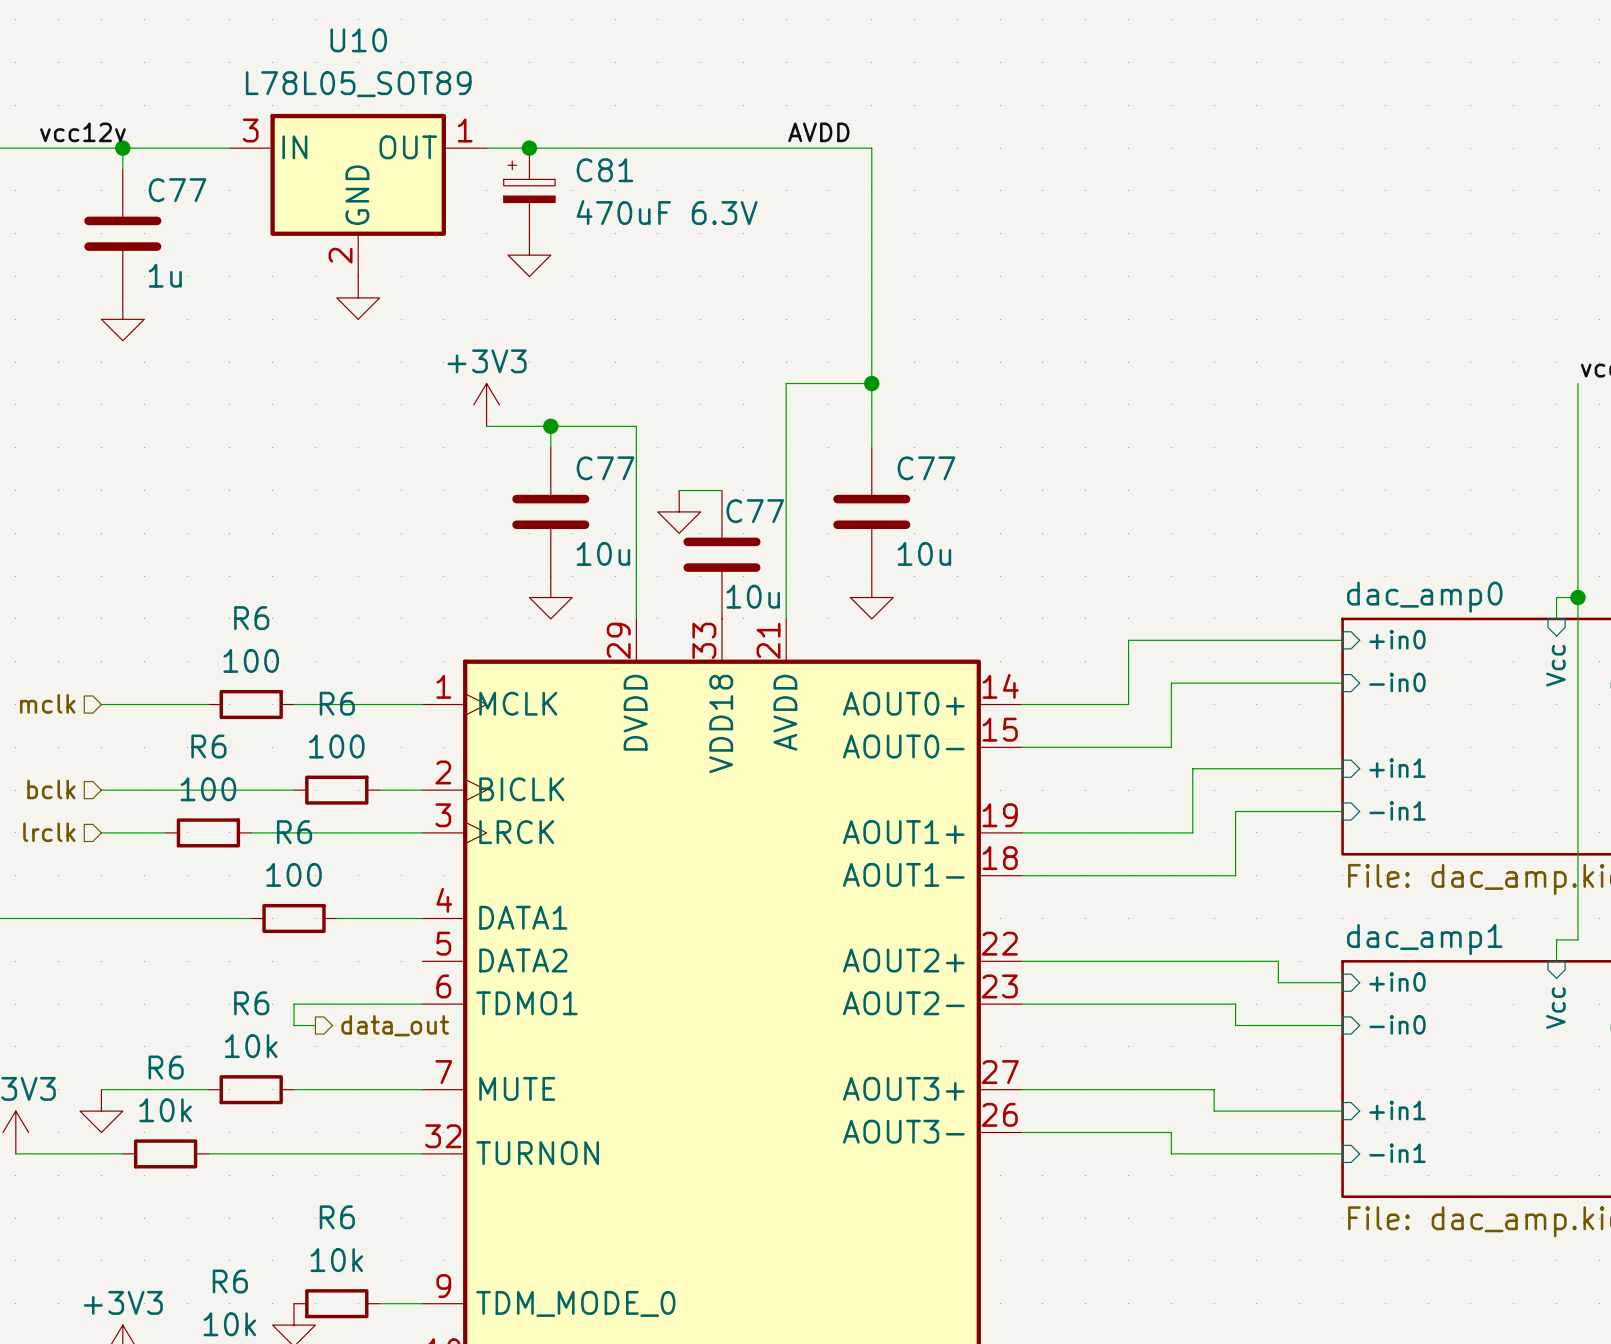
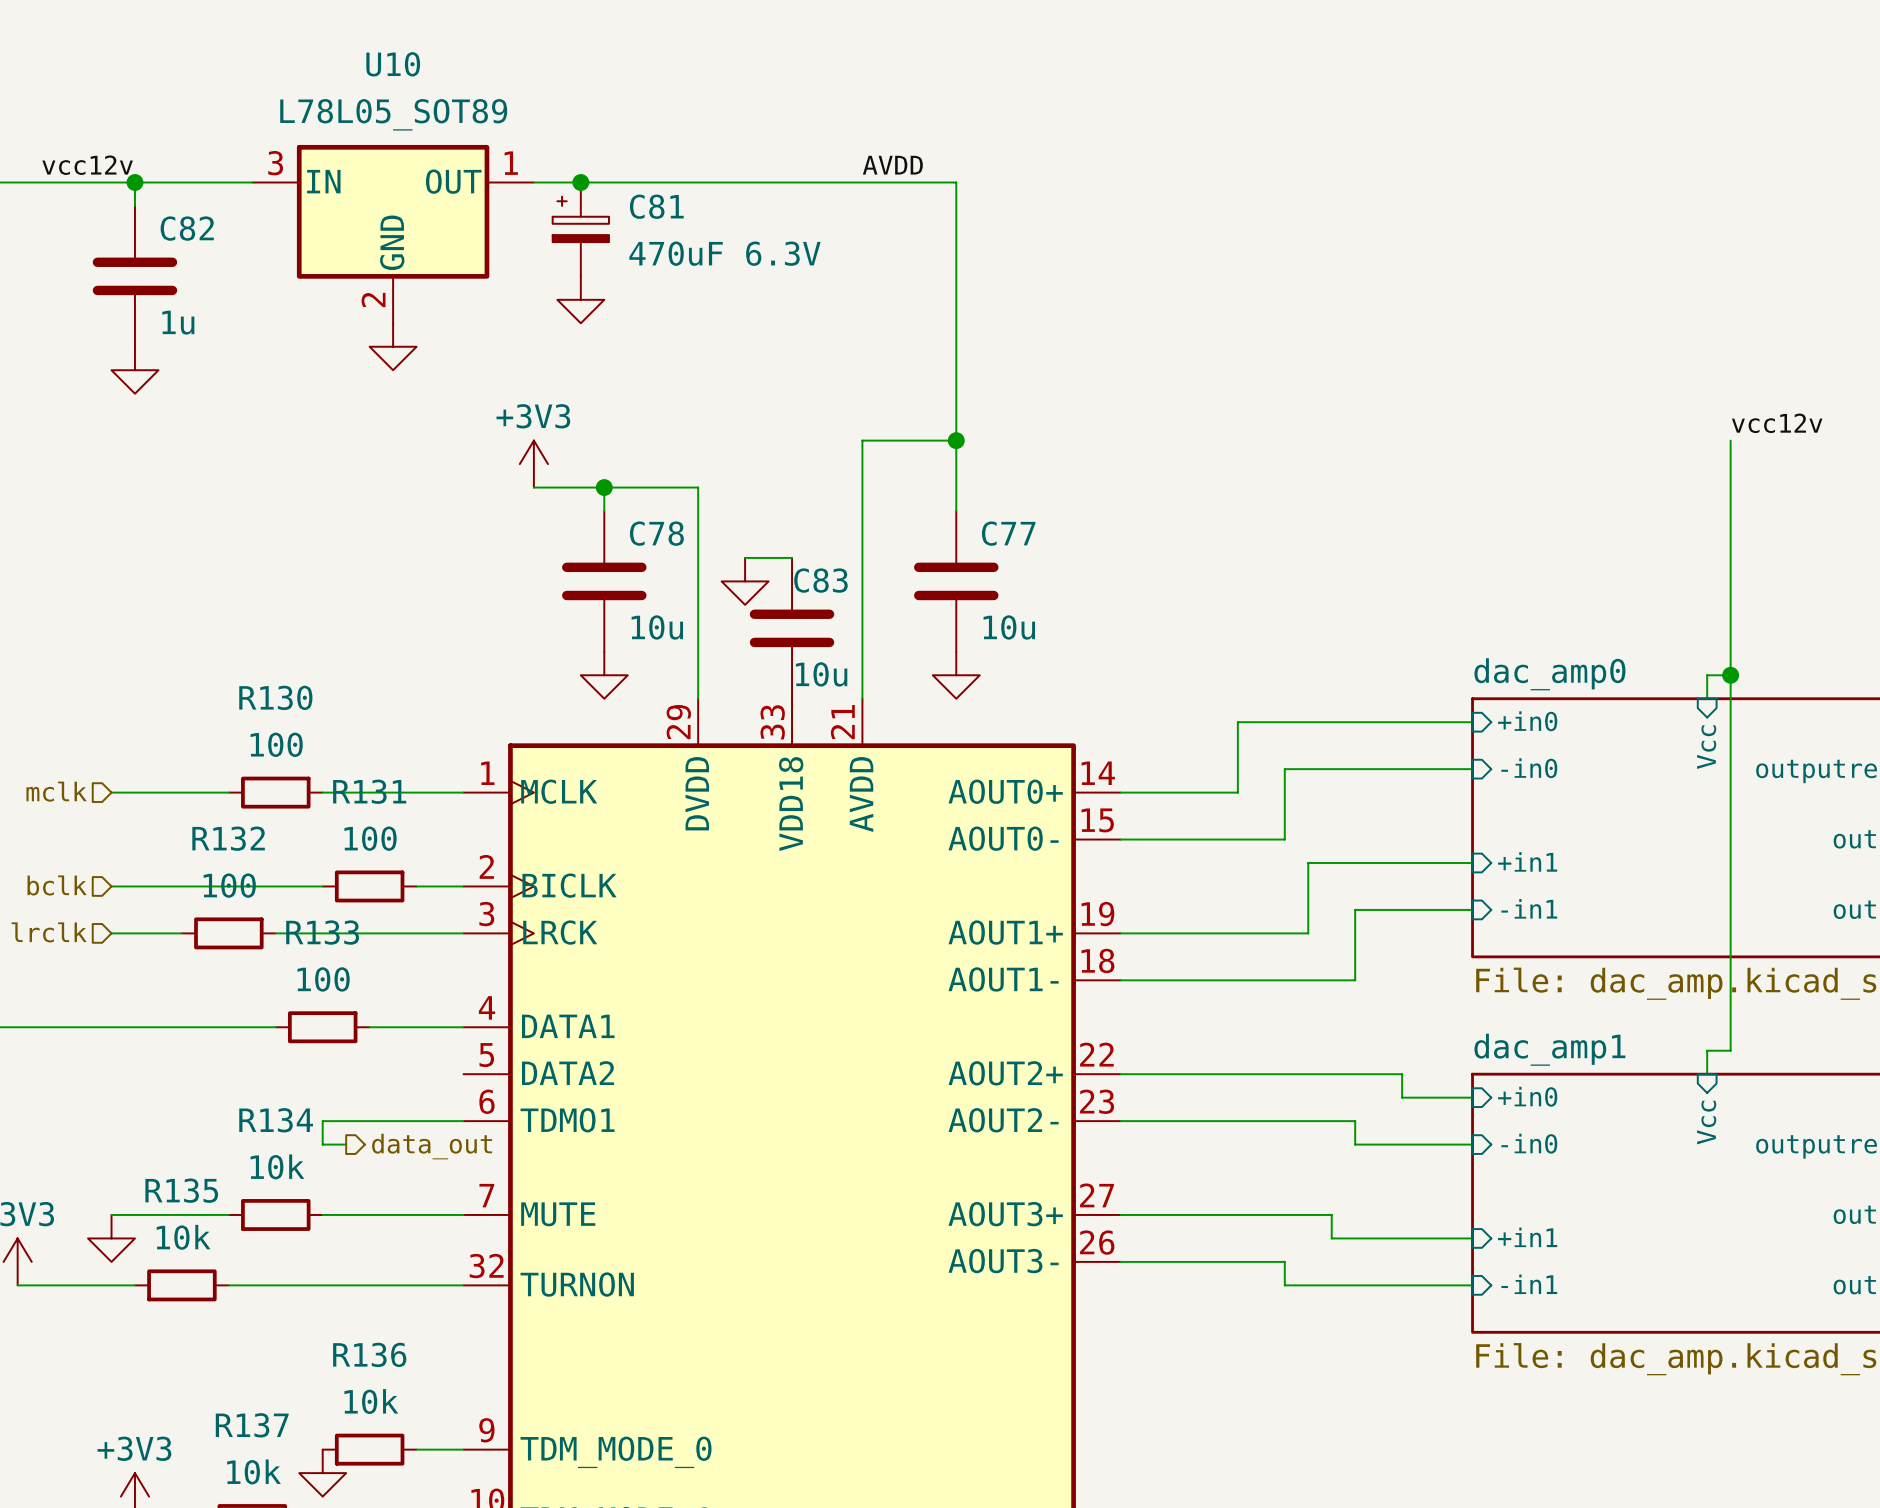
C77 name: C77 (177, 190) -> C82 (187, 228)
C77 name: C77 (605, 468) -> C78 (656, 533)
C77 name: C77 (755, 511) -> C83 (820, 580)
R6 name: R6 (251, 618) -> R130 (275, 697)
R6 name: R6 (337, 703) -> R131 (369, 791)
R6 name: R6 (208, 746) -> R132 (228, 838)
R6 name: R6 (294, 832) -> R133 (322, 932)
R6 name: R6 (251, 1003) -> R134 (276, 1120)
R6 name: R6 (166, 1067) -> R135 (181, 1190)
R6 name: R6 (337, 1217) -> R136 (369, 1354)
R6 name: R6 (230, 1281) -> R137 (252, 1425)

